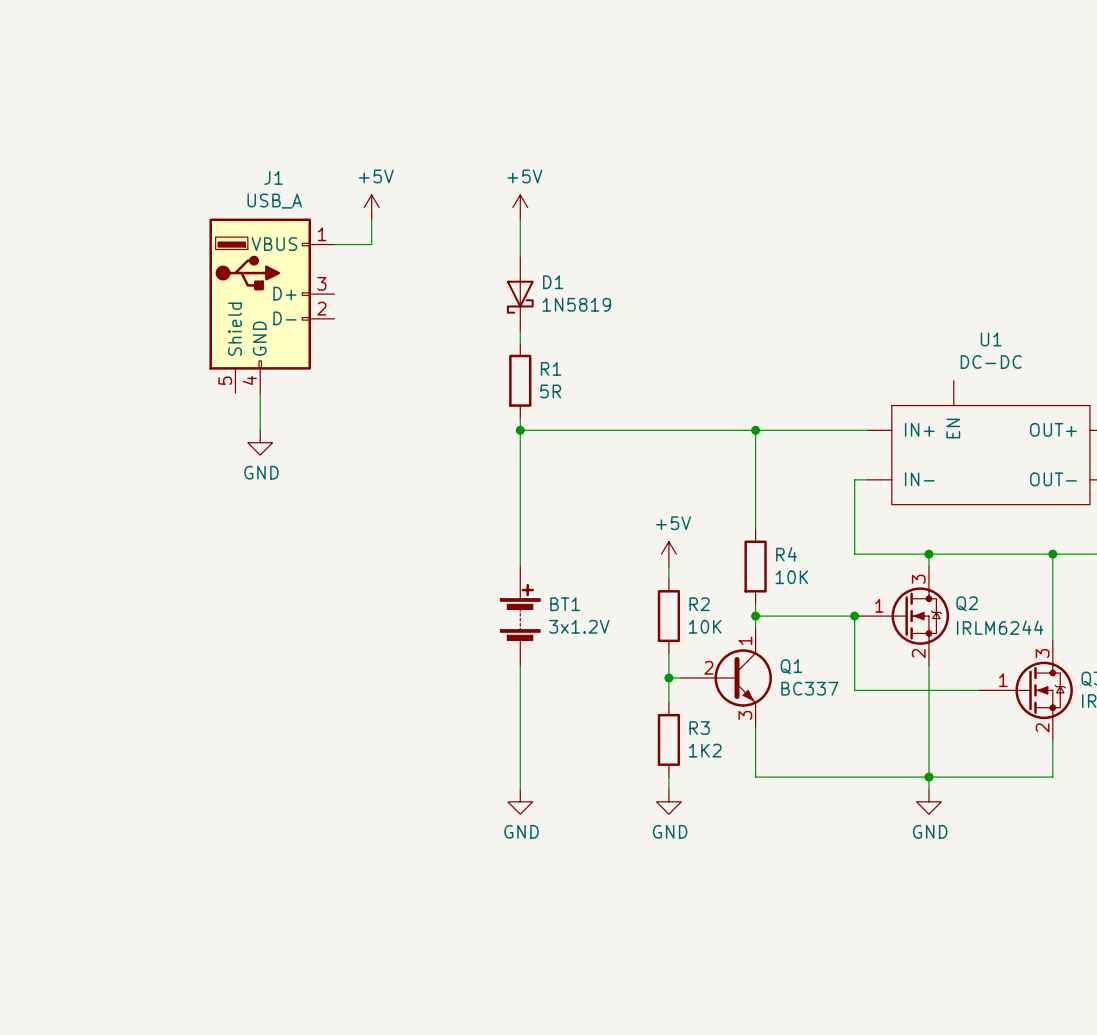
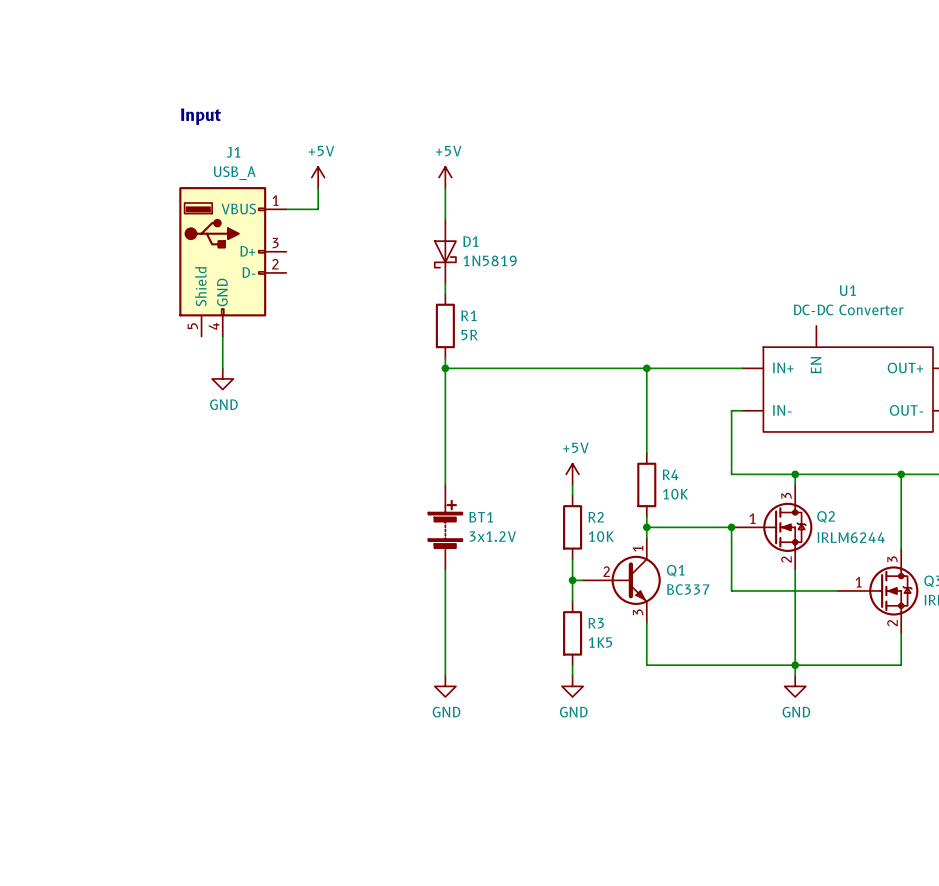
text: none -> Input (200, 116)
U1 value: DC-DC (991, 361) -> DC-DC Converter (848, 309)
R3 value: 1K2 (705, 750) -> 1K5 (600, 642)

